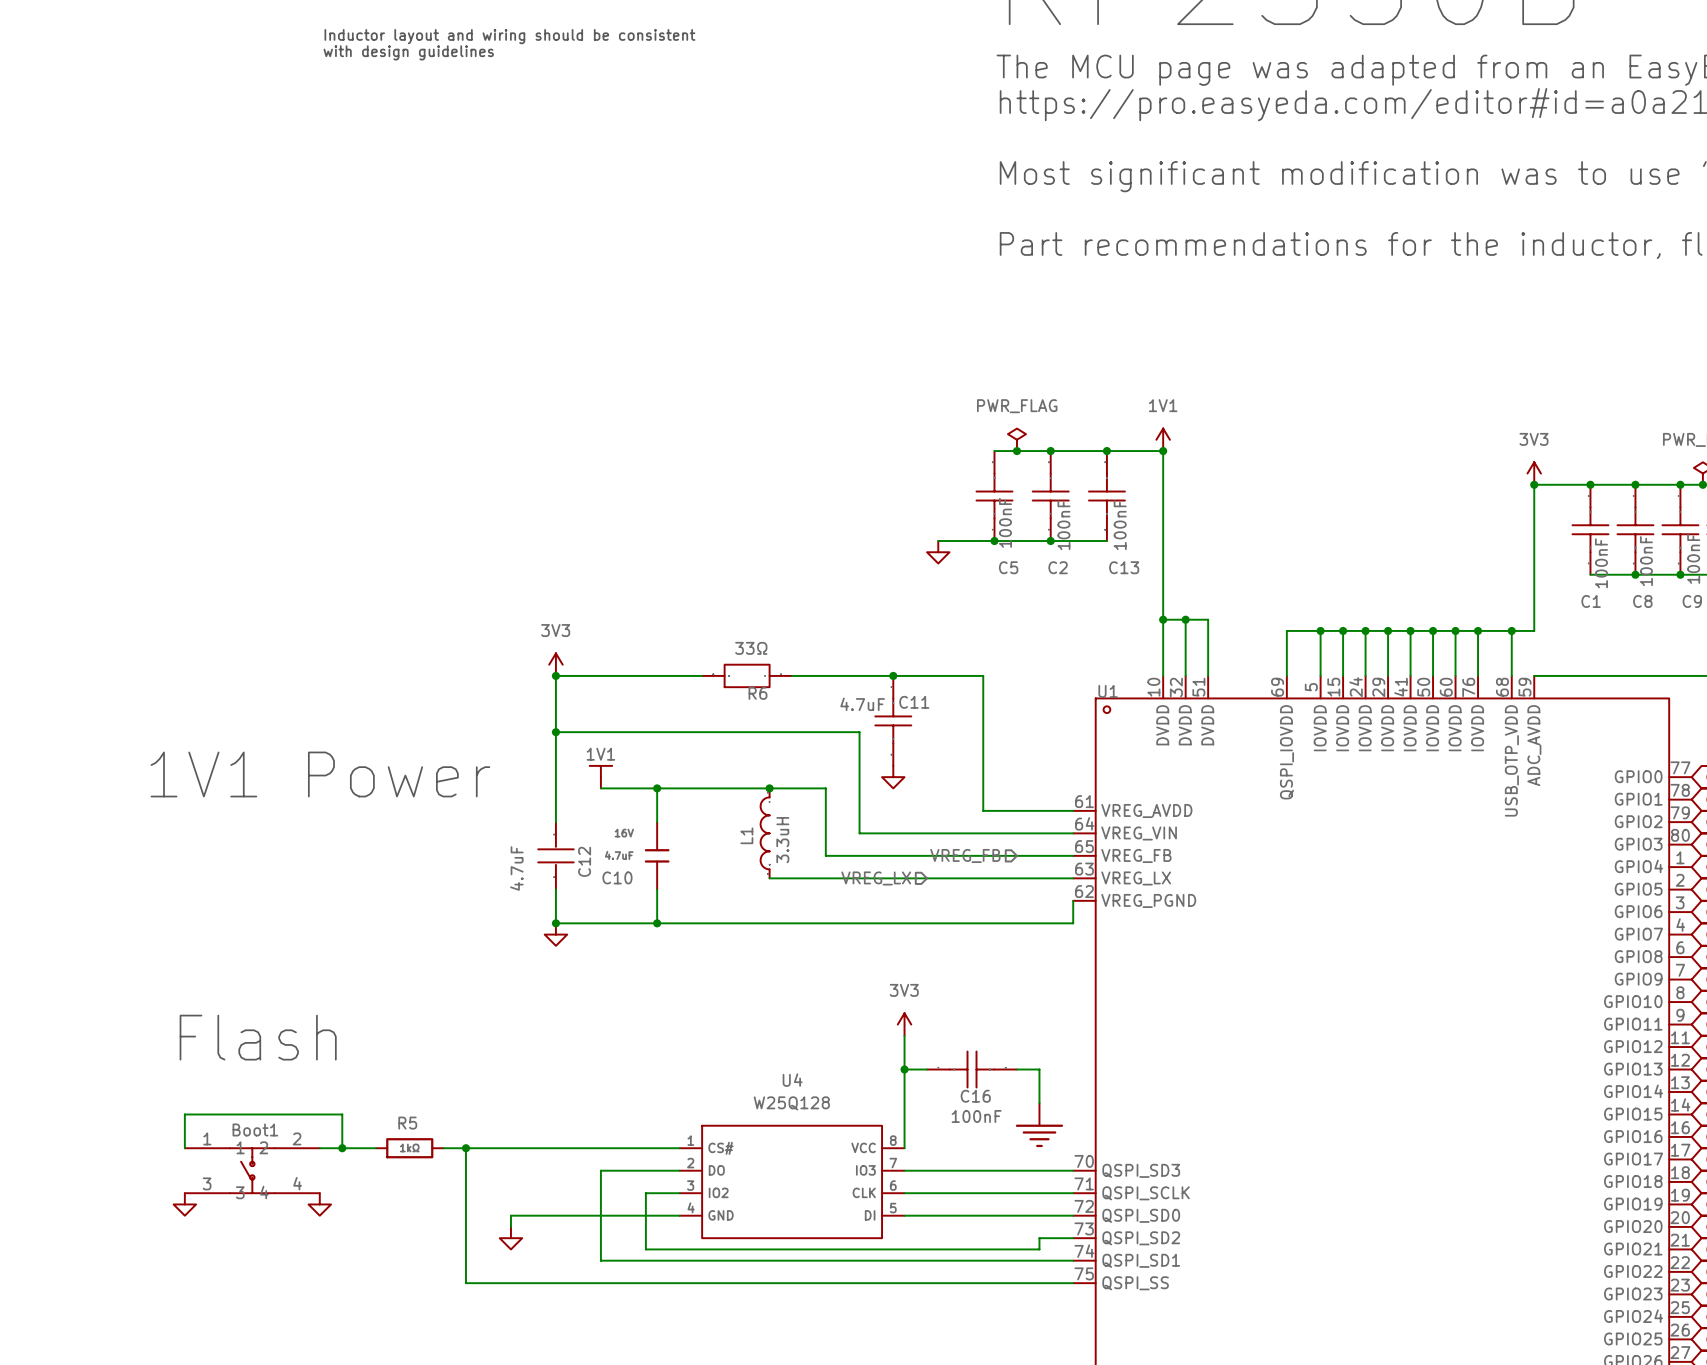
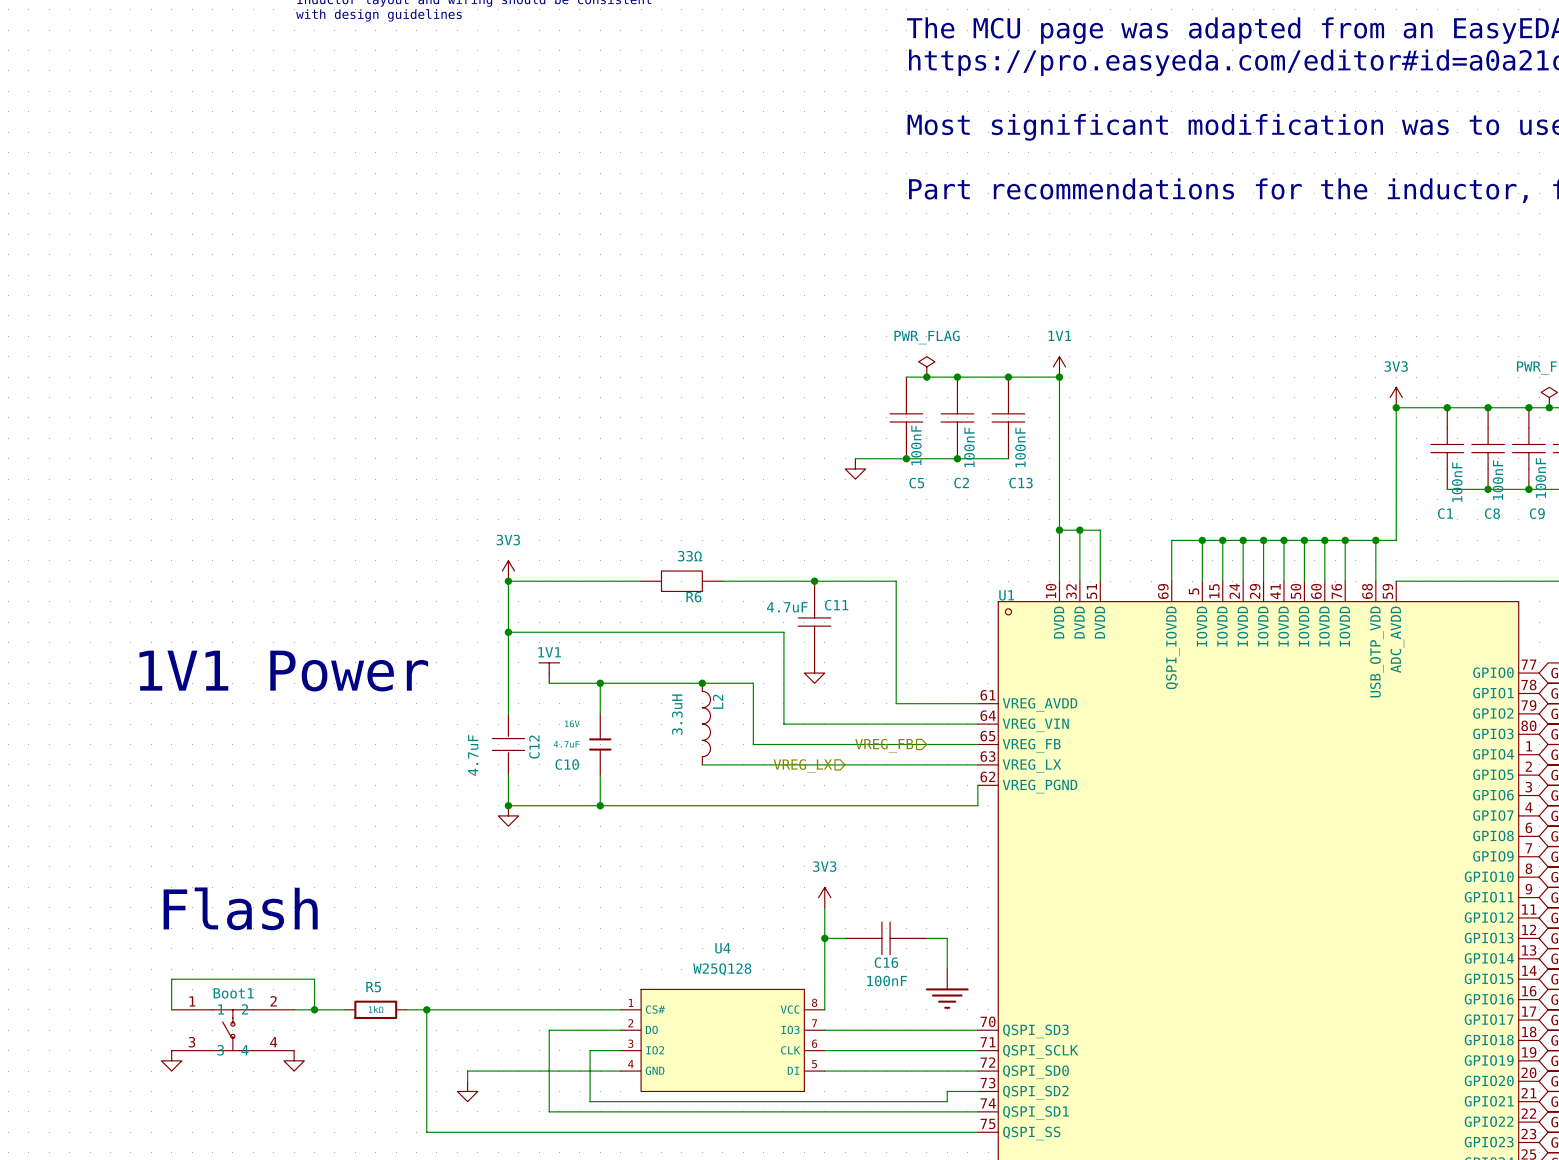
L1: (765, 833) -> none
L2: none -> (706, 724)

